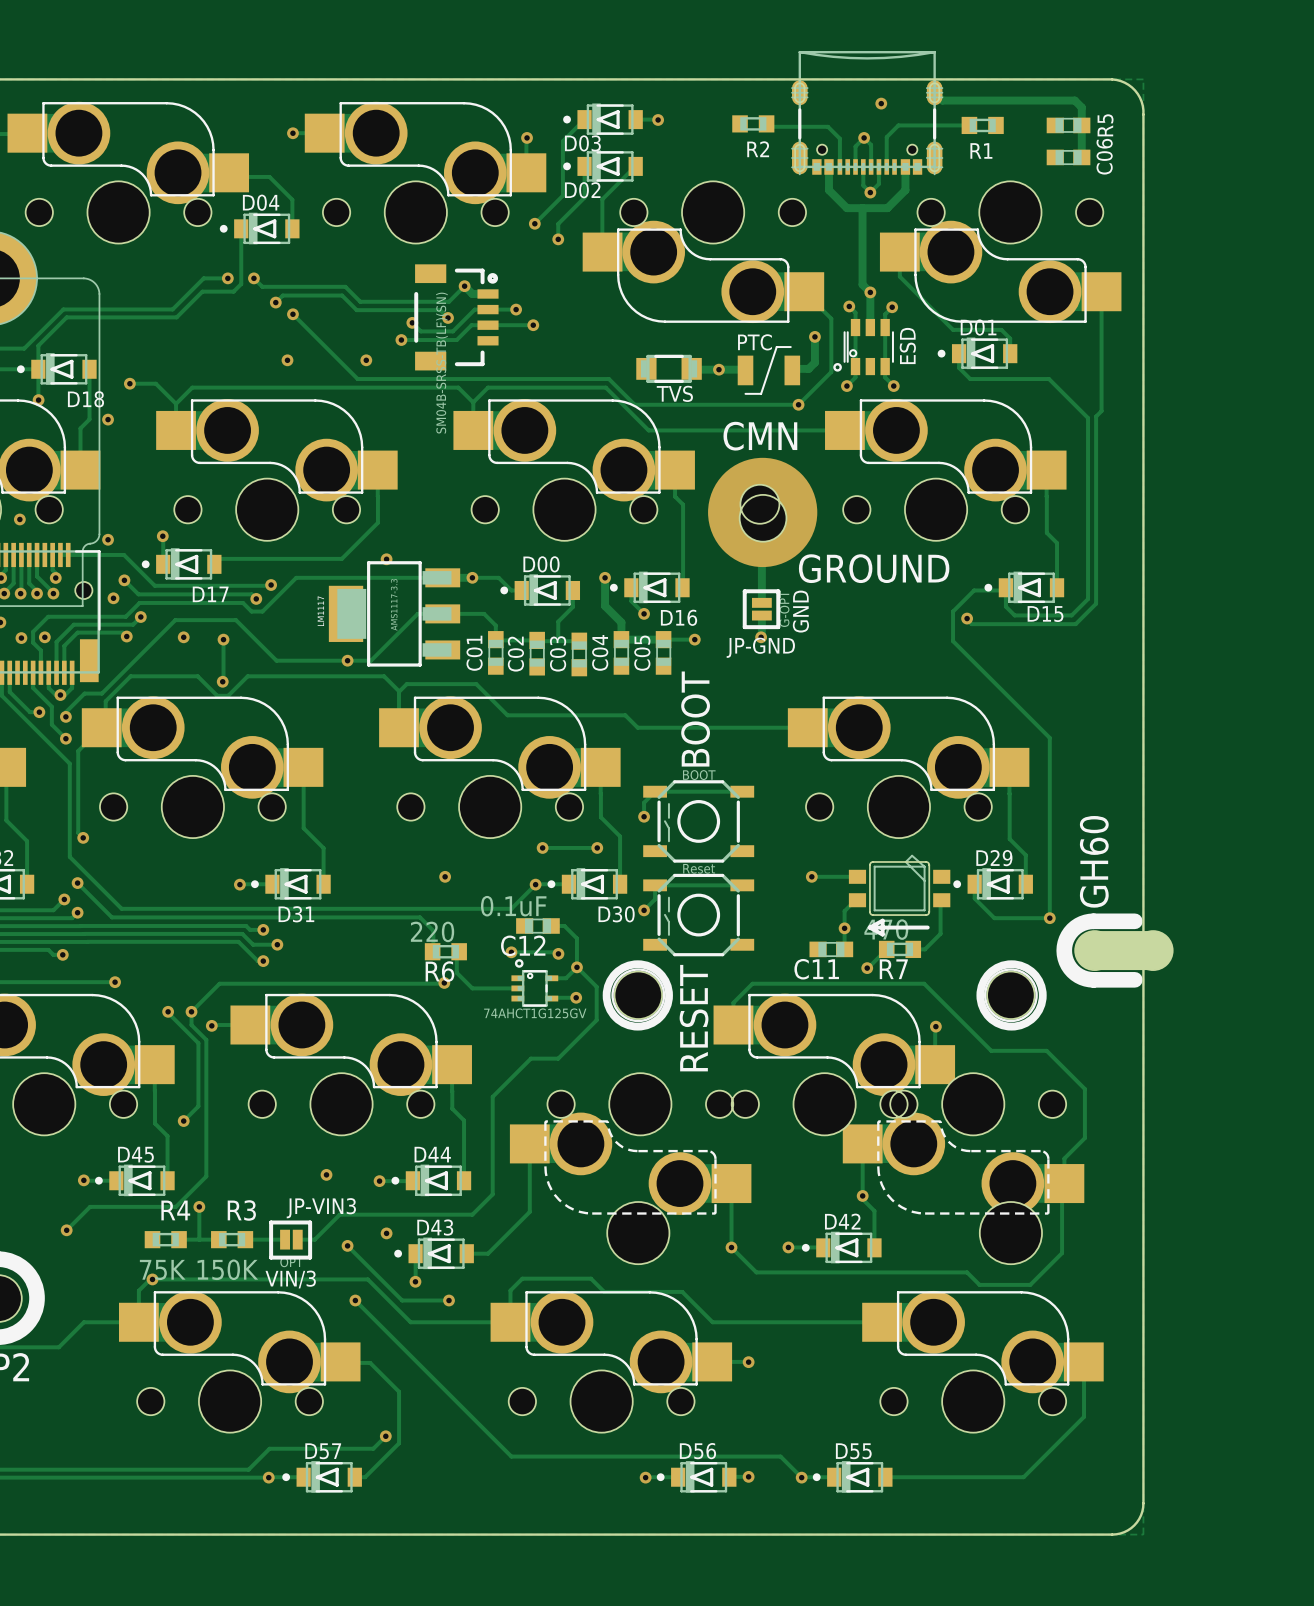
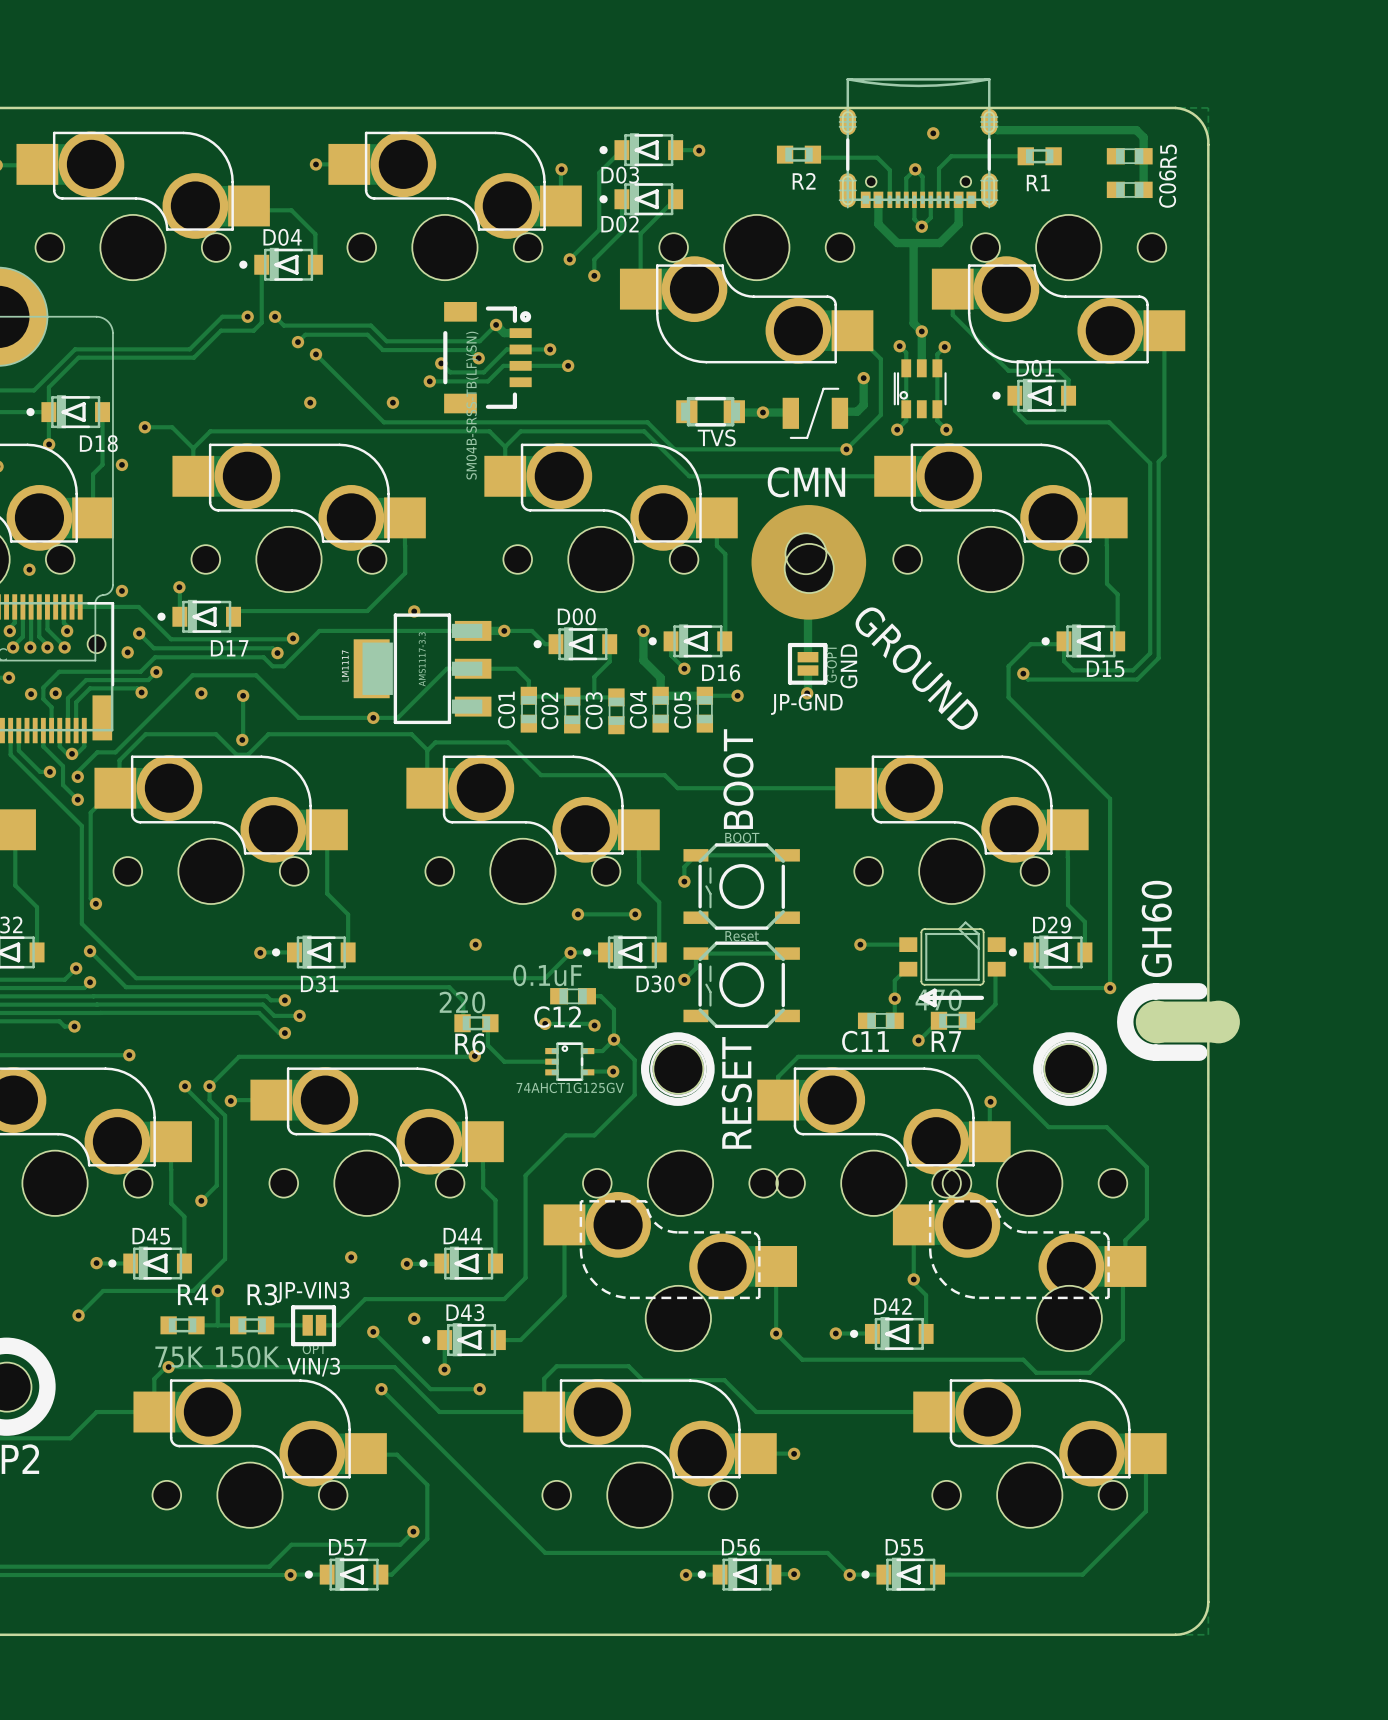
text: PTC (754, 342) -> none
text: ESD (907, 345) -> none
drawing: [833, 363, 842, 372] -> none
text rotation: 0° (874, 568) -> 45° clockwise (916, 668)
drawing: [514, 959, 524, 968] -> none
JP-VIN3 name position: JP-VIN3 (321, 1208) -> JP-VIN3 (313, 1292)

